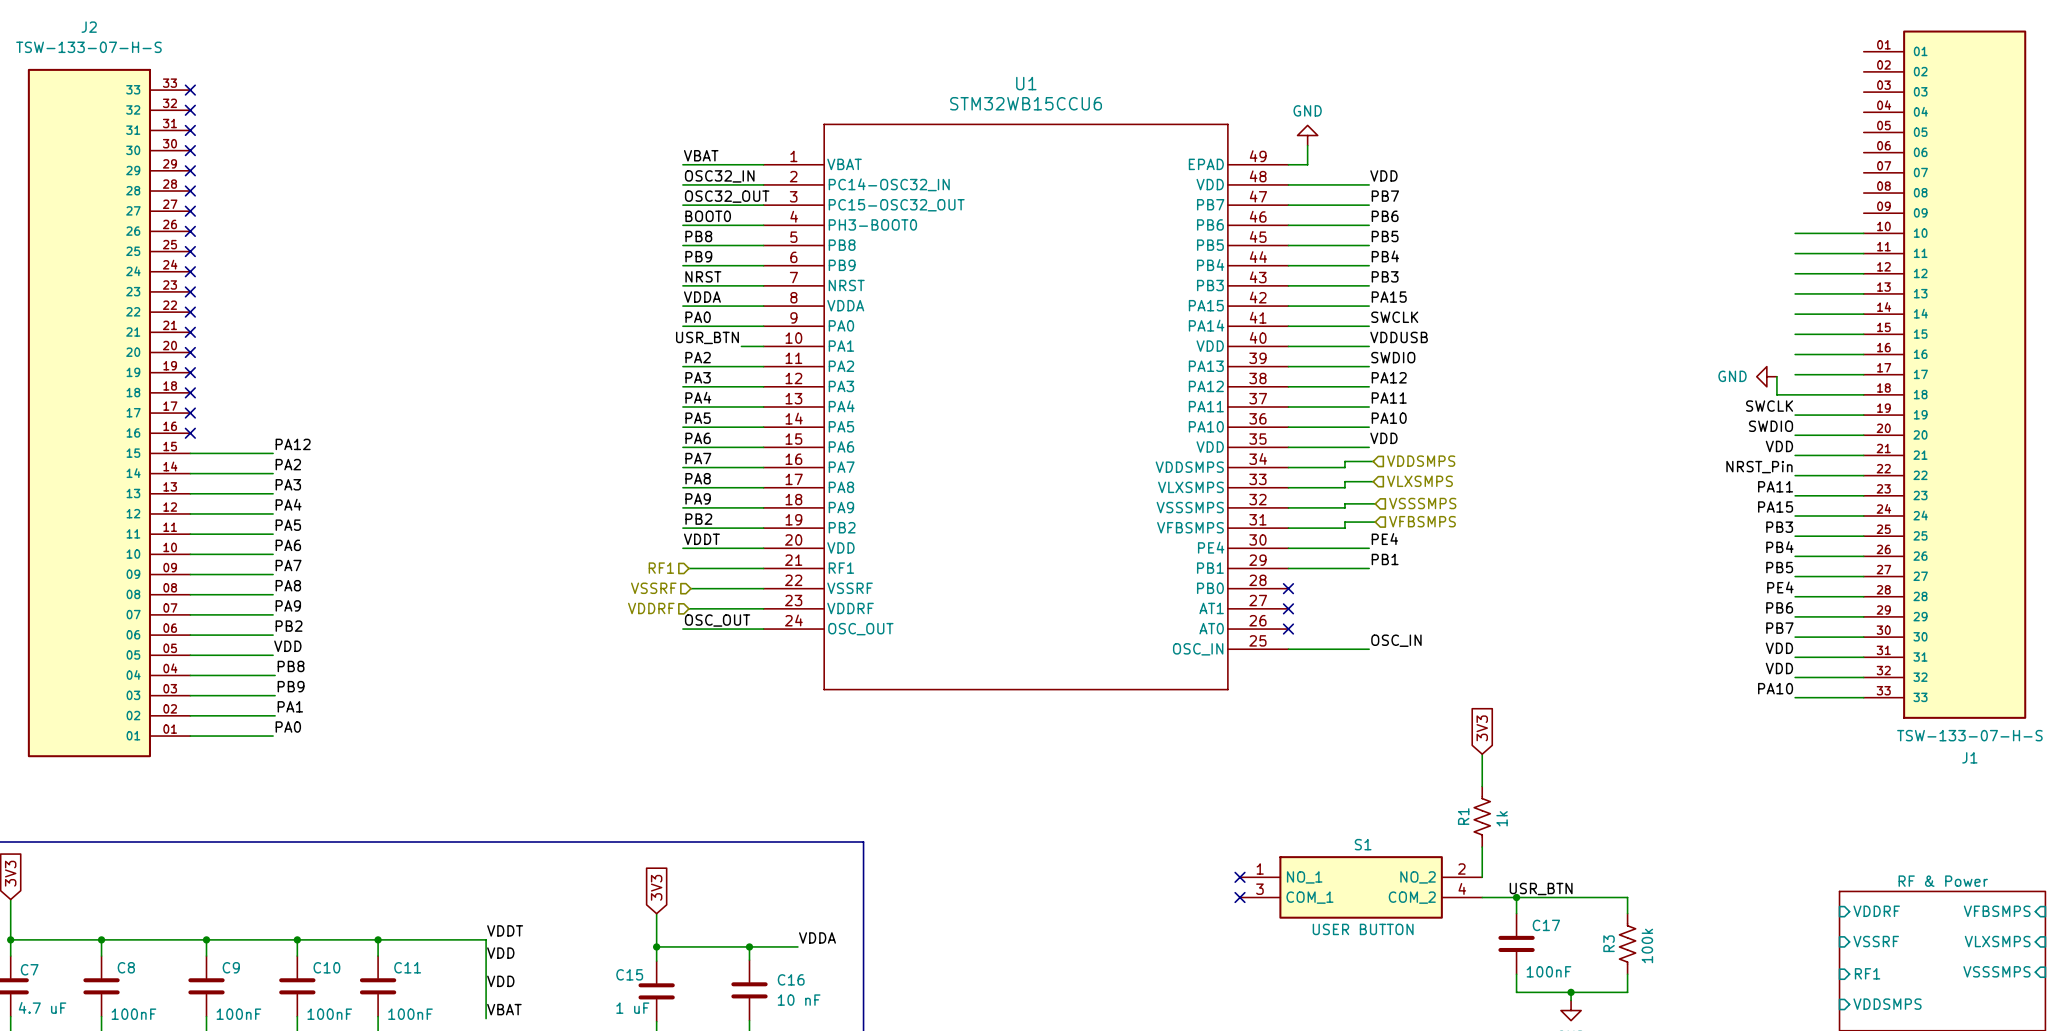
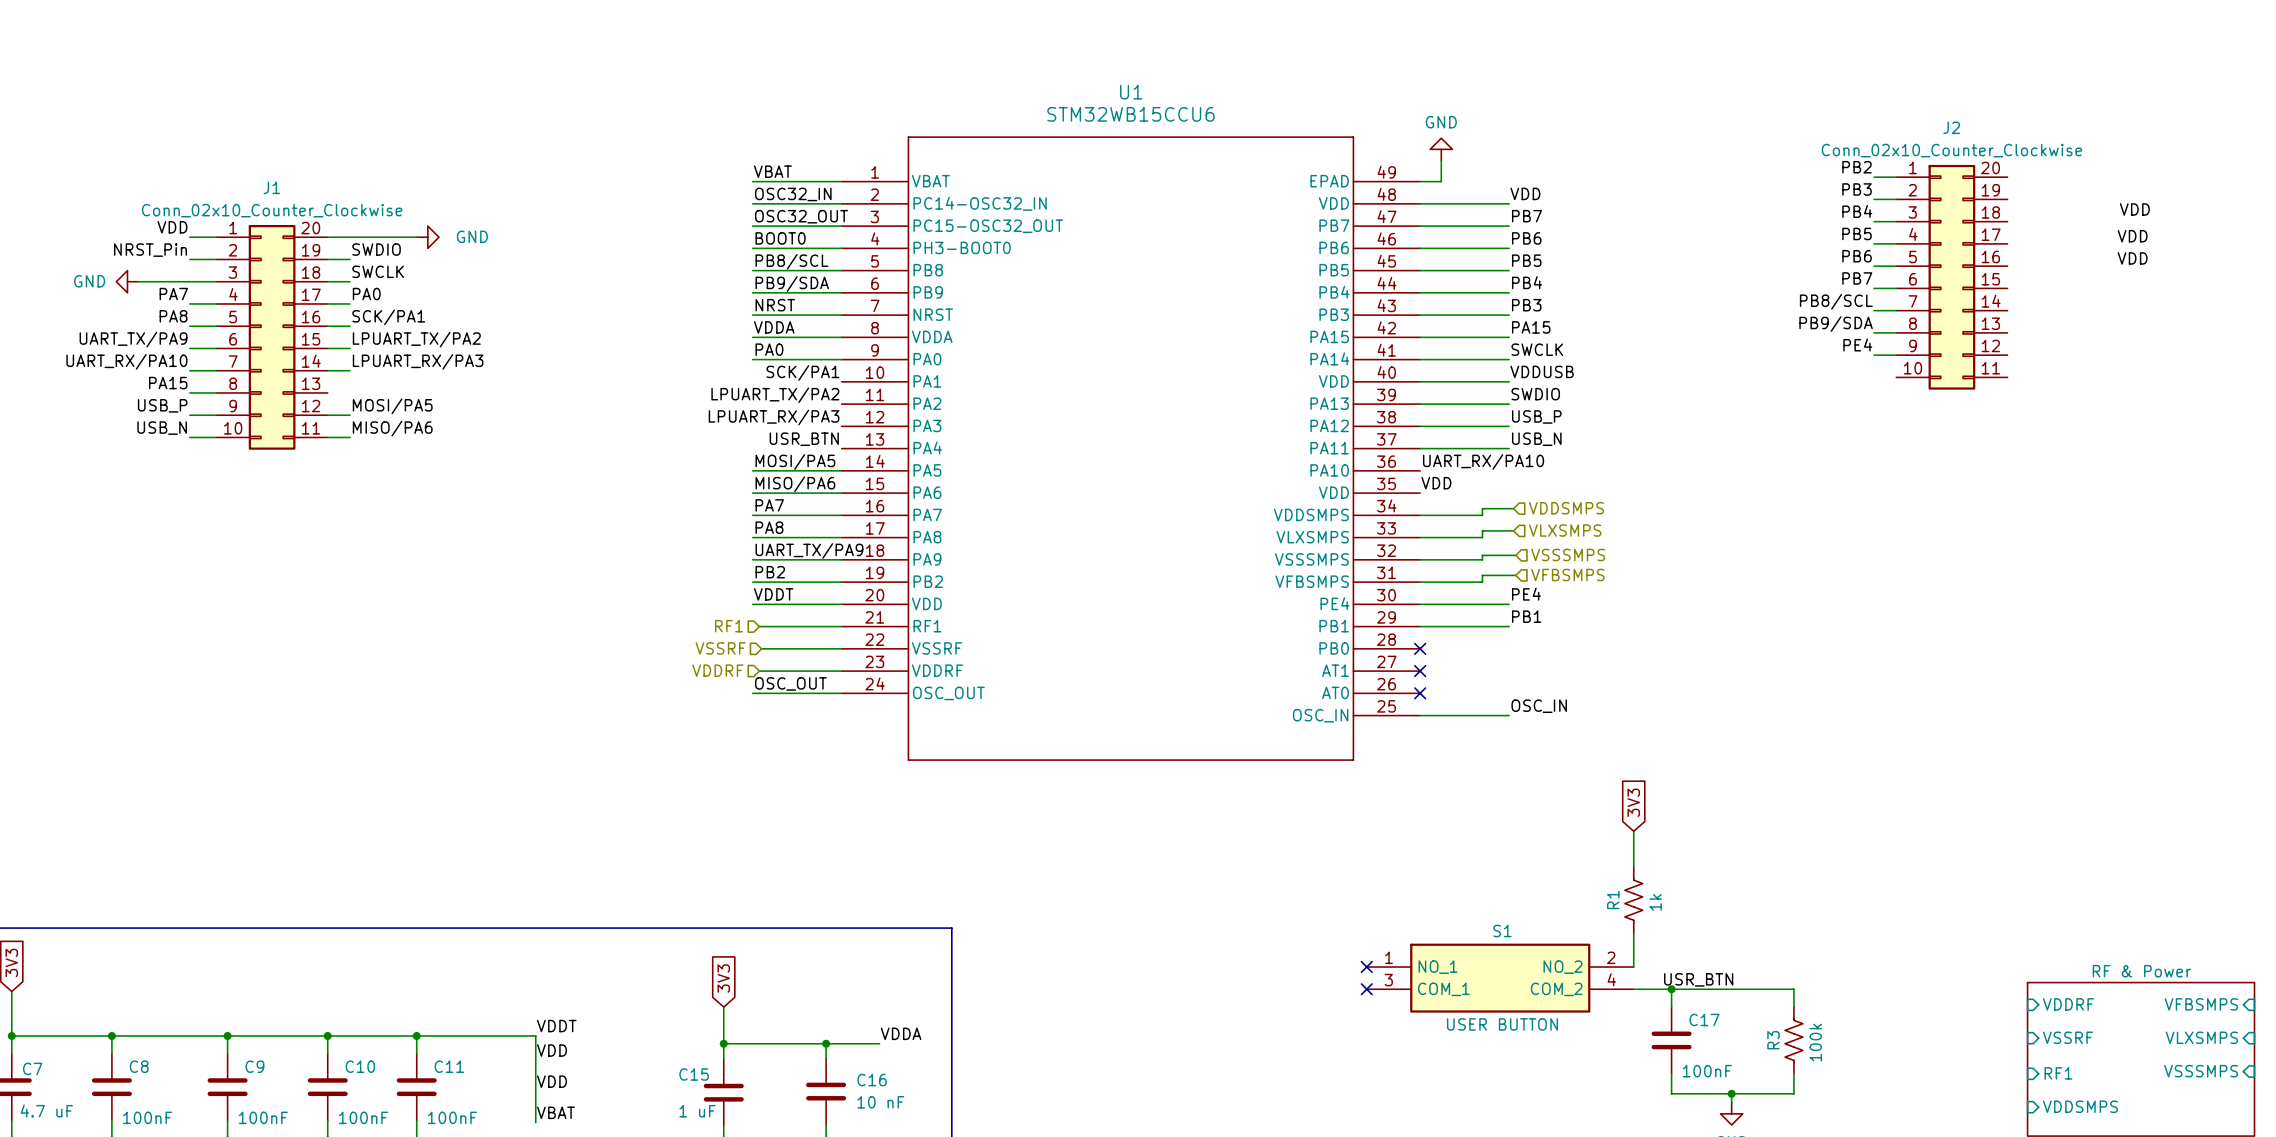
J2 name position: J2 (89, 27) -> J2 (1951, 127)
J1 symbol: [1863, 30, 2027, 719] -> [216, 224, 328, 450]
J2 value: TSW-133-07-H-S (88, 47) -> Conn_02x10_Counter_Clockwise (1951, 150)
J2 symbol: [27, 68, 191, 758] -> [1896, 164, 2008, 390]
no-connect mark: (190, 90) -> none
no-connect mark: (190, 110) -> none
no-connect mark: (190, 130) -> none
no-connect mark: (190, 150) -> none
label: none -> PB2 (1857, 167)
wire: none -> (1874, 177) (1896, 177)
no-connect mark: (190, 170) -> none
label: none -> PB3 (1857, 189)
wire: none -> (1874, 199) (1896, 199)
label: none -> VDD (2134, 209)
no-connect mark: (190, 191) -> none
label: none -> PB4 (1857, 211)
wire: none -> (1874, 221) (1896, 221)
label: none -> VDD (172, 227)
no-connect mark: (190, 211) -> none
label: none -> PB5 (1857, 233)
label: none -> VDD (2132, 236)
wire: none -> (189, 237) (216, 237)
wire: none -> (327, 237) (416, 237)
power symbol: none -> GND (427, 237)
wire: none -> (1874, 243) (1896, 243)
label: none -> NRST_Pin (150, 250)
label: none -> SWDIO (376, 249)
no-connect mark: (190, 231) -> none
label: none -> PB6 (1857, 256)
wire: (1795, 233) (1863, 233) -> none
label: none -> VDD (2132, 258)
wire: none -> (189, 259) (216, 259)
wire: none -> (327, 259) (349, 259)
label: PB8 (698, 236) -> PB8/SCL (791, 261)
wire: none -> (1874, 266) (1896, 266)
label: none -> SWCLK (378, 271)
no-connect mark: (190, 251) -> none
label: none -> PB7 (1857, 278)
wire: (1795, 253) (1863, 253) -> none
power symbol: none -> GND (127, 281)
wire: none -> (138, 281) (216, 281)
wire: none -> (327, 281) (349, 281)
label: PB9 (698, 256) -> PB9/SDA (792, 283)
wire: none -> (1874, 288) (1896, 288)
label: none -> PA7 (173, 294)
label: none -> PA0 (366, 294)
no-connect mark: (190, 271) -> none
label: none -> PB8/SCL (1836, 301)
wire: (1795, 273) (1863, 273) -> none
wire: none -> (189, 303) (216, 303)
wire: none -> (327, 303) (349, 303)
wire: none -> (1874, 310) (1896, 310)
label: none -> PA8 (173, 316)
label: none -> SCK/PA1 (388, 317)
no-connect mark: (190, 291) -> none
label: none -> PB9/SDA (1836, 324)
wire: (1795, 293) (1863, 293) -> none
wire: none -> (189, 326) (216, 326)
wire: none -> (327, 326) (349, 326)
wire: none -> (1874, 332) (1896, 332)
label: none -> UART_TX/PA9 (133, 339)
label: none -> LPUART_TX/PA2 (416, 339)
no-connect mark: (190, 312) -> none
label: none -> PE4 (1857, 344)
wire: (1795, 314) (1863, 314) -> none
wire: none -> (189, 348) (216, 348)
wire: none -> (327, 348) (349, 348)
wire: none -> (1874, 355) (1896, 355)
label: none -> UART_RX/PA10 (126, 361)
label: none -> LPUART_RX/PA3 (418, 361)
no-connect mark: (190, 332) -> none
wire: (1795, 334) (1863, 334) -> none
wire: none -> (189, 370) (216, 370)
wire: none -> (327, 370) (349, 370)
label position: USR_BTN (707, 337) -> USR_BTN (804, 439)
label: none -> SCK/PA1 (802, 372)
wire: (741, 346) (763, 346) -> none
label: none -> PA15 (168, 383)
no-connect mark: (190, 352) -> none
wire: (1795, 354) (1863, 354) -> none
wire: none -> (189, 392) (216, 392)
label: PA2 (698, 357) -> none
label: none -> LPUART_TX/PA2 (775, 395)
wire: (682, 366) (763, 366) -> none
label: none -> USB_P (162, 405)
label: none -> MOSI/PA5 (392, 406)
no-connect mark: (190, 372) -> none
wire: (1795, 374) (1863, 374) -> none
wire: none -> (189, 415) (216, 415)
wire: none -> (327, 415) (349, 415)
power symbol: GND (1766, 376) -> none
wire: (1776, 376) (1776, 394) (1863, 394) -> none
label: PA3 (698, 377) -> none
label: PA12 (1389, 377) -> USB_P (1536, 416)
label: none -> LPUART_RX/PA3 (774, 417)
wire: (682, 386) (763, 386) -> none
label: none -> USB_N (162, 428)
label: none -> MISO/PA6 (392, 428)
no-connect mark: (190, 392) -> none
wire: none -> (189, 437) (216, 437)
wire: none -> (327, 437) (349, 437)
label: PA4 (698, 397) -> none
label: PA11 (1389, 397) -> USB_N (1536, 439)
wire: (682, 406) (763, 406) -> none
label: SWCLK (1769, 406) -> none
no-connect mark: (190, 413) -> none
wire: (1795, 415) (1863, 415) -> none
label: PA5 (698, 418) -> MOSI/PA5 (795, 461)
label: PA10 (1389, 418) -> none
label: none -> UART_RX/PA10 (1483, 461)
label: SWDIO (1771, 426) -> none
wire: (1288, 427) (1369, 427) -> none
no-connect mark: (190, 433) -> none
wire: (1795, 435) (1863, 435) -> none
label: PA6 (698, 438) -> MISO/PA6 (795, 484)
label position: VDD (1383, 438) -> VDD (1436, 483)
label: PA12 (293, 444) -> none
label: VDD (1779, 446) -> none
wire: (1288, 447) (1369, 447) -> none
wire: (190, 453) (273, 453) -> none
wire: (1795, 455) (1863, 455) -> none
label: PA2 (288, 464) -> none
label: NRST_Pin (1759, 467) -> none
wire: (190, 473) (273, 473) -> none
wire: (1795, 475) (1863, 475) -> none
label: PA3 (288, 484) -> none
label: PA11 (1775, 486) -> none
wire: (190, 493) (273, 493) -> none
wire: (1795, 495) (1863, 495) -> none
label: PA9 (698, 498) -> UART_TX/PA9 (809, 550)
label: PA4 (288, 504) -> none
label: PA15 (1775, 506) -> none
wire: (190, 513) (273, 513) -> none
wire: (1795, 516) (1863, 516) -> none
label: PA5 (288, 525) -> none
label: PB3 (1779, 527) -> none
wire: (190, 534) (273, 534) -> none
wire: (1795, 536) (1863, 536) -> none
label: PA6 (288, 545) -> none
label: PB4 (1779, 547) -> none
wire: (190, 554) (273, 554) -> none
wire: (1795, 556) (1863, 556) -> none
label: PA7 (288, 565) -> none
label: PB5 (1779, 567) -> none
wire: (190, 574) (273, 574) -> none
wire: (1795, 576) (1863, 576) -> none
label: PA8 (288, 585) -> none
label: PE4 (1780, 587) -> none
wire: (190, 594) (273, 594) -> none
wire: (1795, 596) (1863, 596) -> none
label: PA9 (288, 605) -> none
label: PB6 (1779, 607) -> none
wire: (190, 614) (273, 614) -> none
wire: (1795, 616) (1863, 616) -> none
label: PB2 (289, 626) -> none
label: PB7 (1779, 628) -> none
wire: (190, 635) (273, 635) -> none
wire: (1795, 637) (1863, 637) -> none
label: VDD (287, 646) -> none
label: VDD (1779, 648) -> none
wire: (190, 655) (273, 655) -> none
wire: (1795, 657) (1863, 657) -> none
label: PB8 (291, 666) -> none
label: VDD (1779, 668) -> none
wire: (190, 675) (275, 675) -> none
wire: (1795, 677) (1863, 677) -> none
label: PB9 (291, 686) -> none
label: PA10 (1775, 688) -> none
wire: (190, 695) (275, 695) -> none
wire: (1795, 697) (1863, 697) -> none
label: PA1 (290, 706) -> none
wire: (190, 715) (275, 715) -> none
label: PA0 (288, 727) -> none
J1 value: TSW-133-07-H-S (1969, 735) -> Conn_02x10_Counter_Clockwise (272, 210)
wire: (190, 736) (273, 736) -> none
J1 name position: J1 (1969, 757) -> J1 (271, 187)

